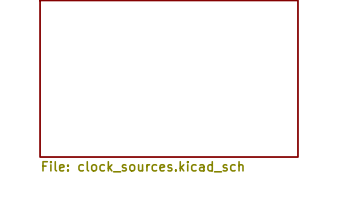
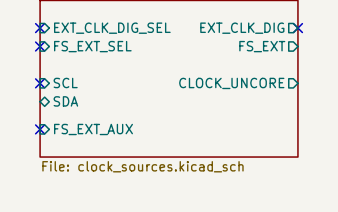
no-connect mark: none -> (40, 28)
sheet pin: none -> EXT_CLK_DIG_SEL (112, 28)
sheet pin: none -> EXT_CLK_DIG (242, 28)
no-connect mark: none -> (297, 28)
no-connect mark: none -> (40, 46)
sheet pin: none -> FS_EXT_SEL (92, 46)
sheet pin: none -> FS_EXT (262, 46)
sheet pin: none -> SCL (65, 82)
no-connect mark: none -> (40, 83)
sheet pin: none -> CLOCK_UNCORE (231, 83)
sheet pin: none -> SDA (65, 101)
no-connect mark: none -> (40, 129)
sheet pin: none -> FS_EXT_AUX (93, 129)

